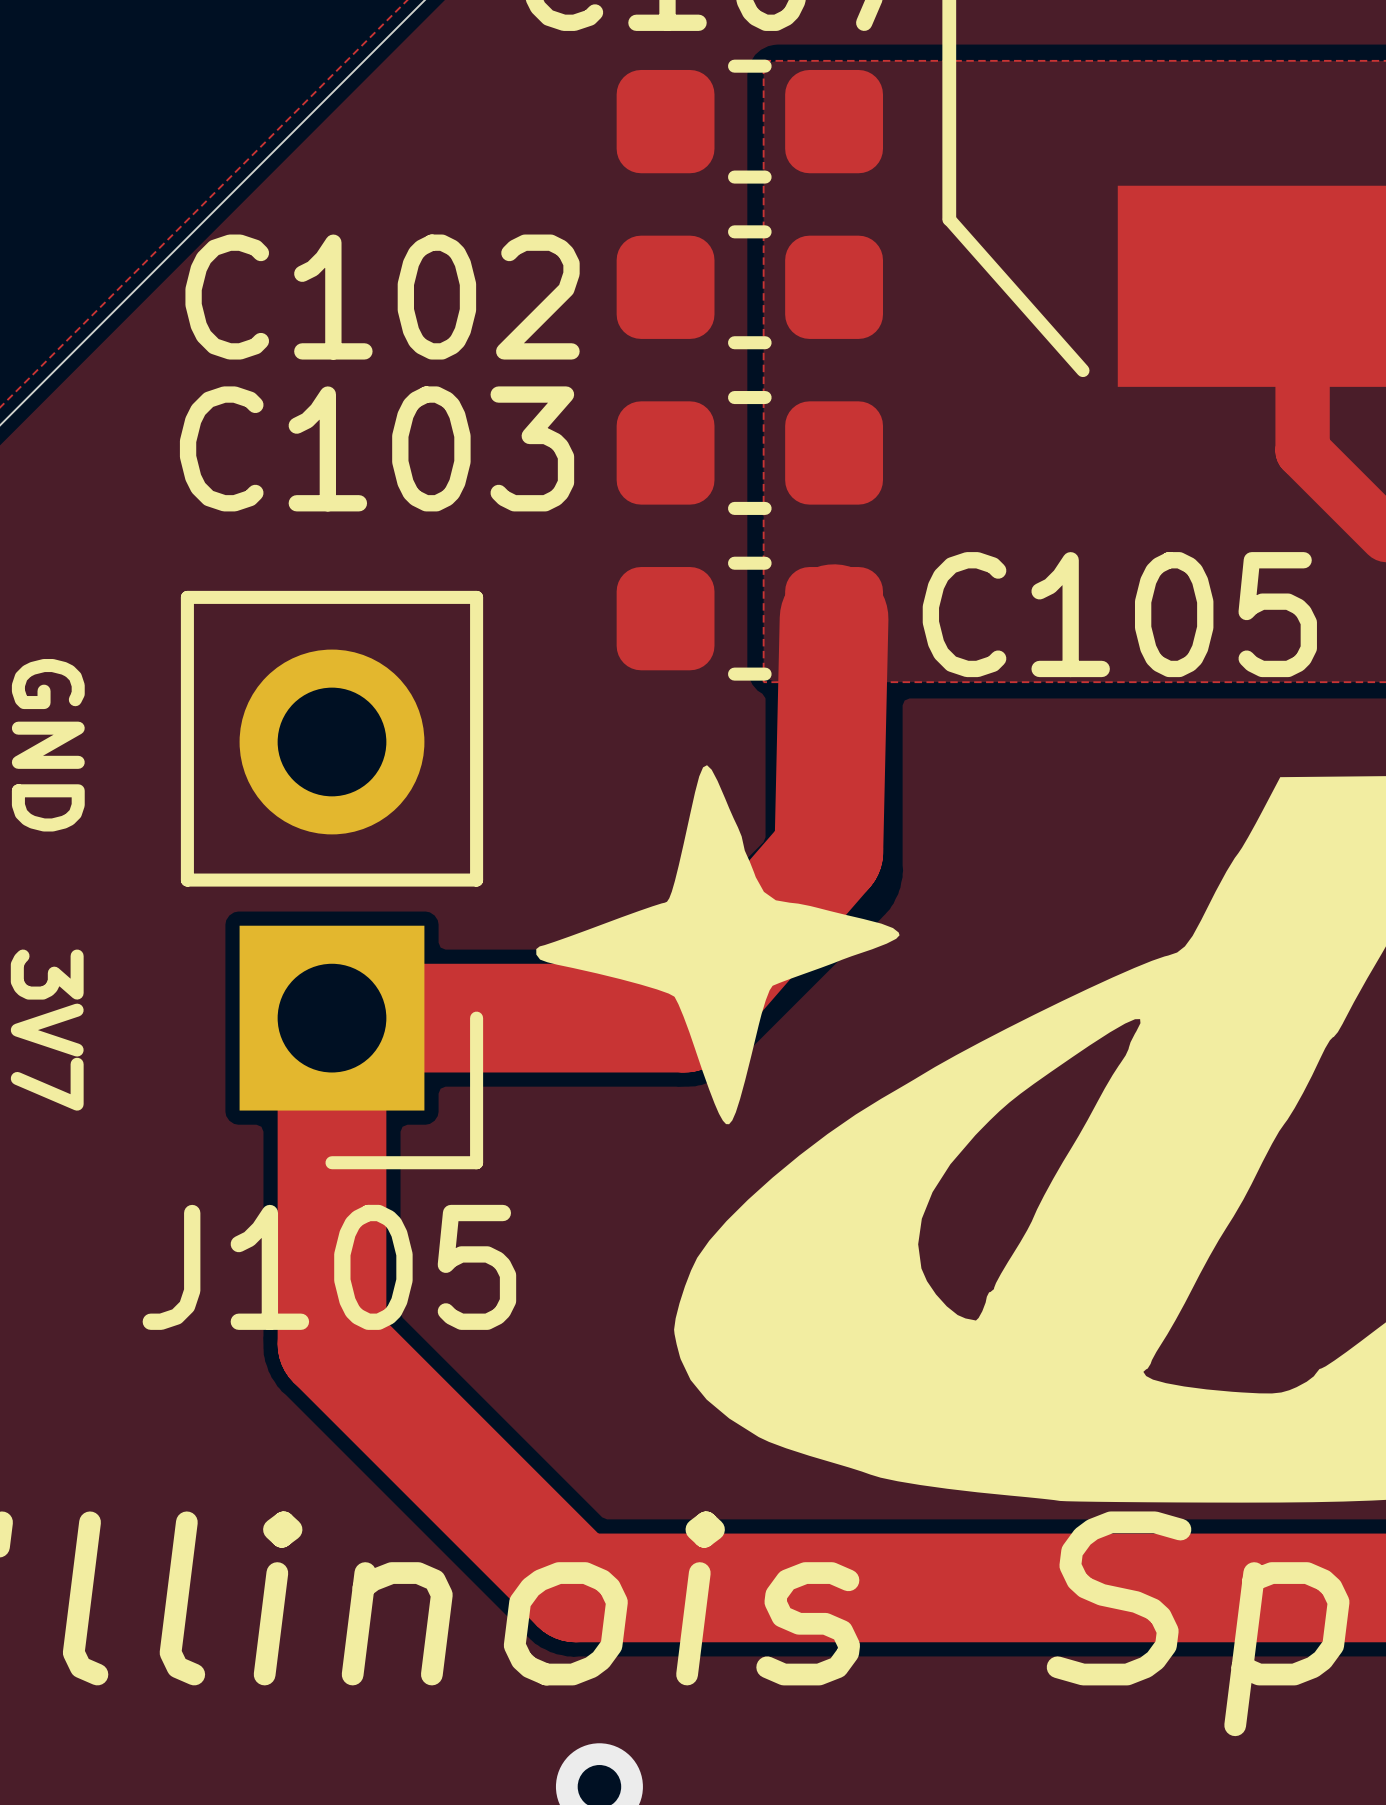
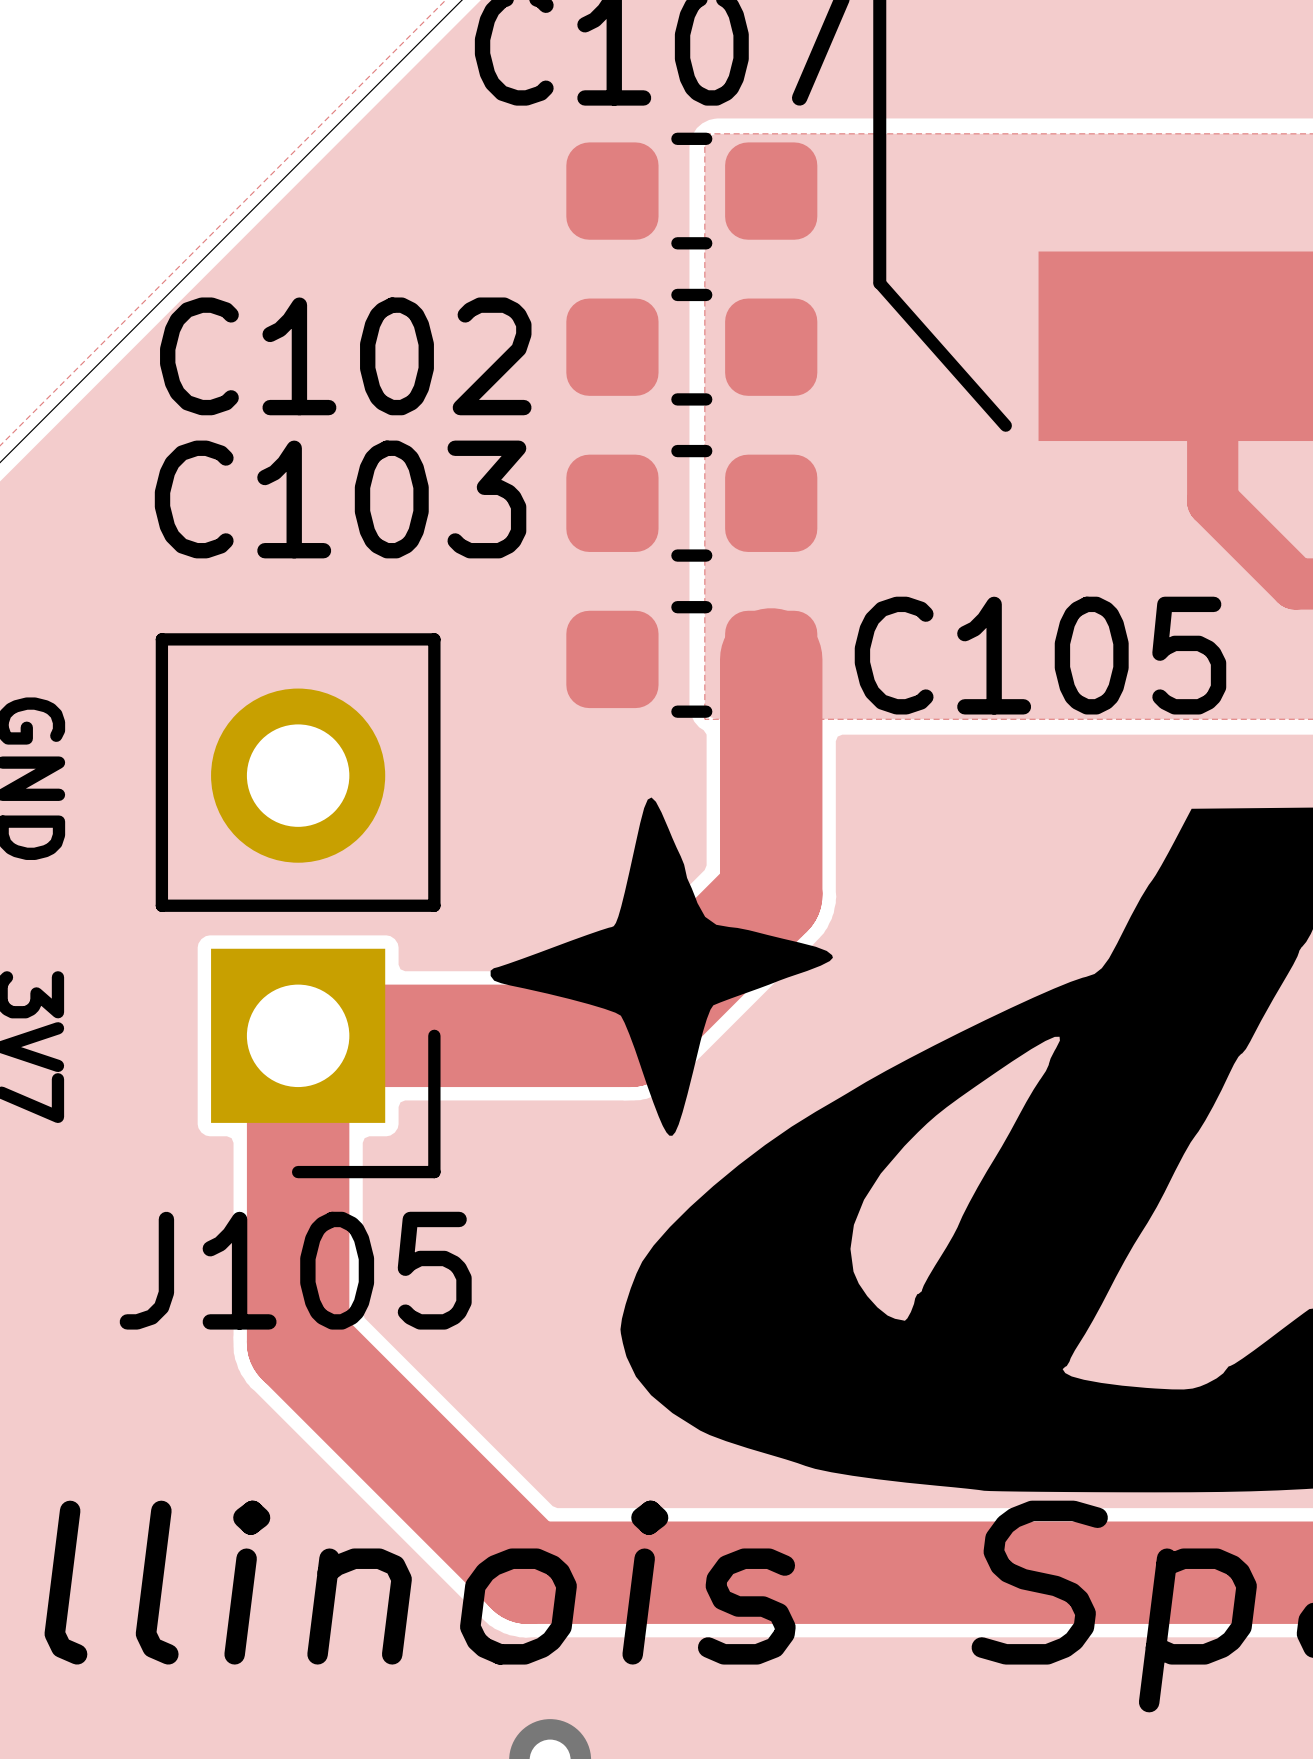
track: (834, 618) (828, 851) (684, 1018) -> (771, 659) (771, 894) (630, 1035)

